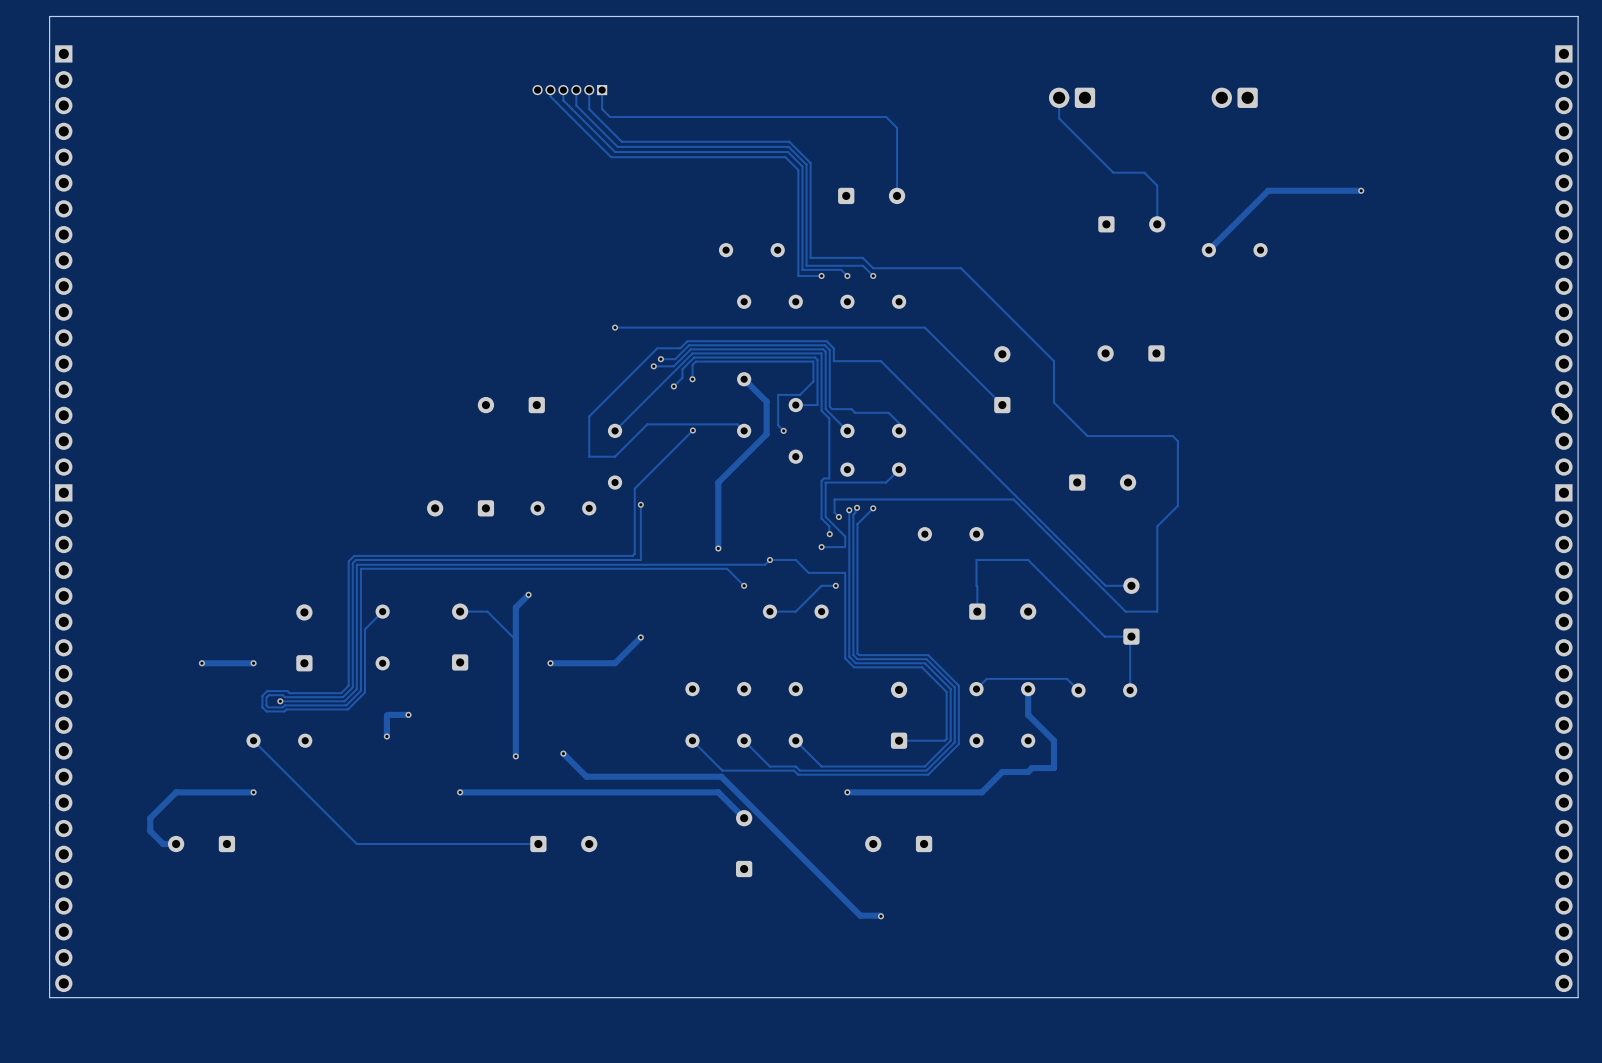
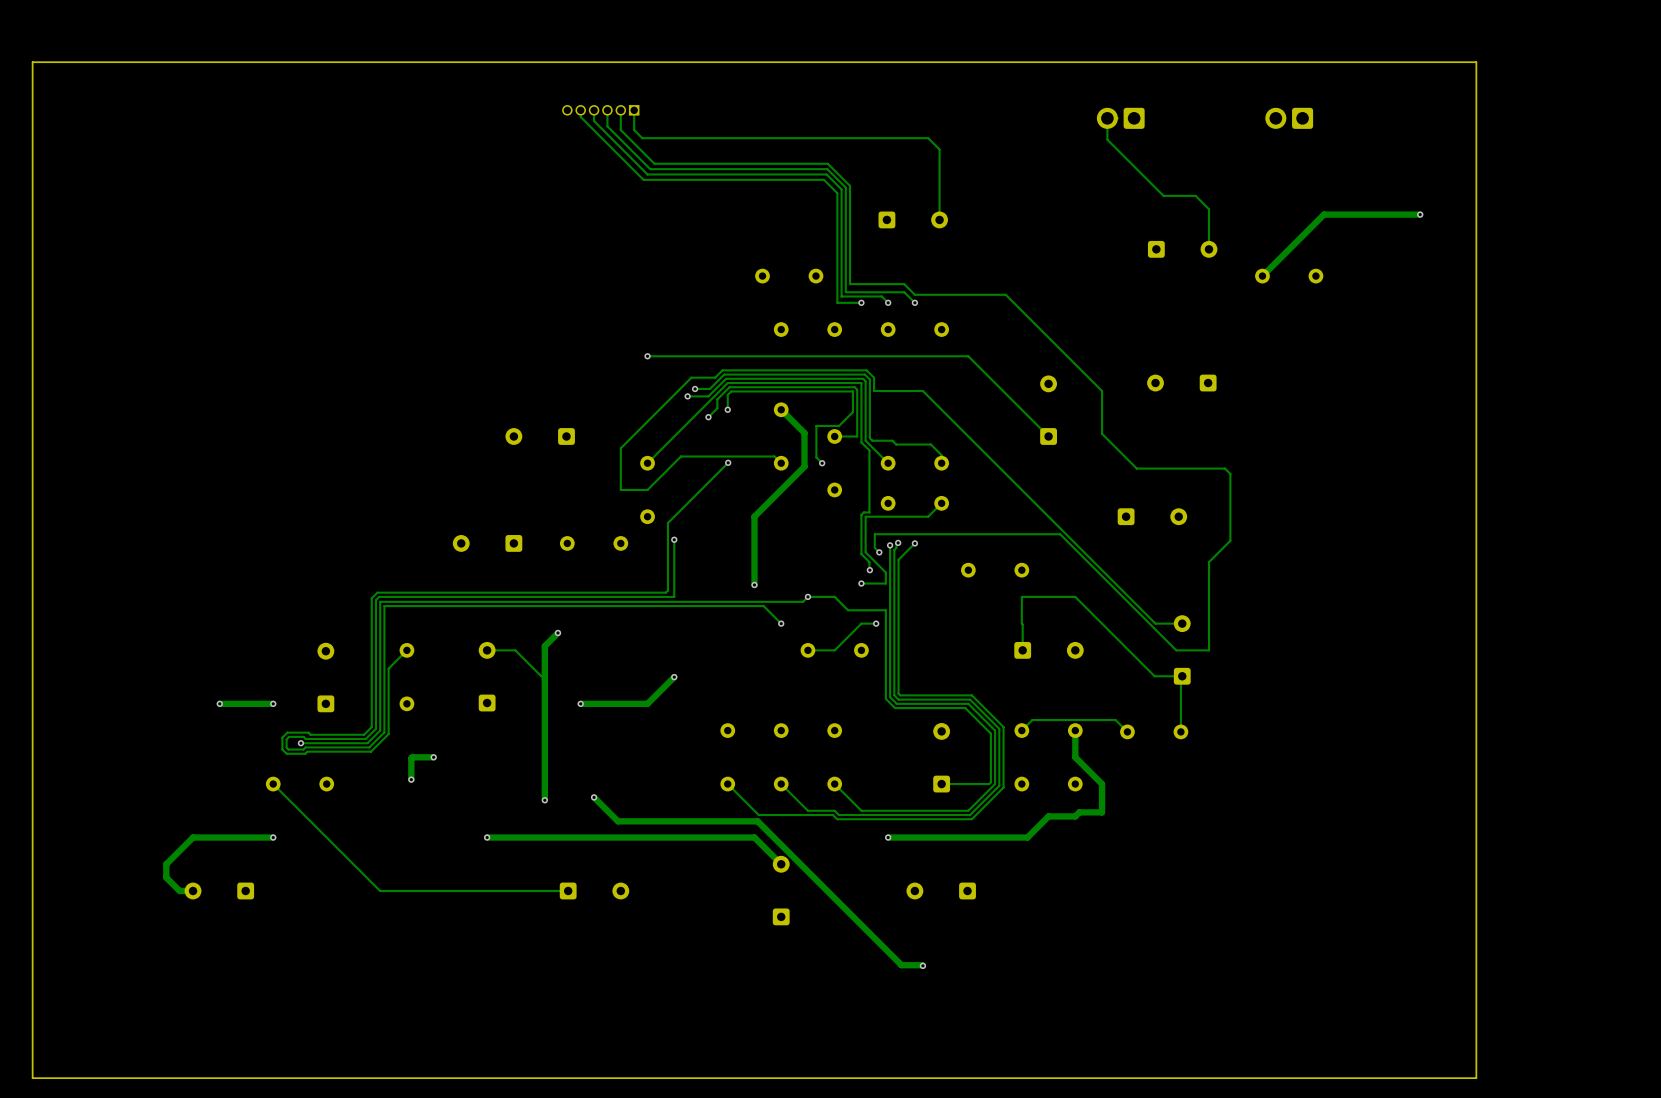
board edge: (1578, 16) (49, 16) (49, 997) (1578, 997) (1578, 16) -> (1476, 62) (1476, 1078) (32, 1078) (32, 62) (1476, 62)
part: (63, 260) -> none
part: (1563, 260) -> none
part: (1560, 411) -> none
part: (63, 738) -> none
part: (1563, 738) -> none

